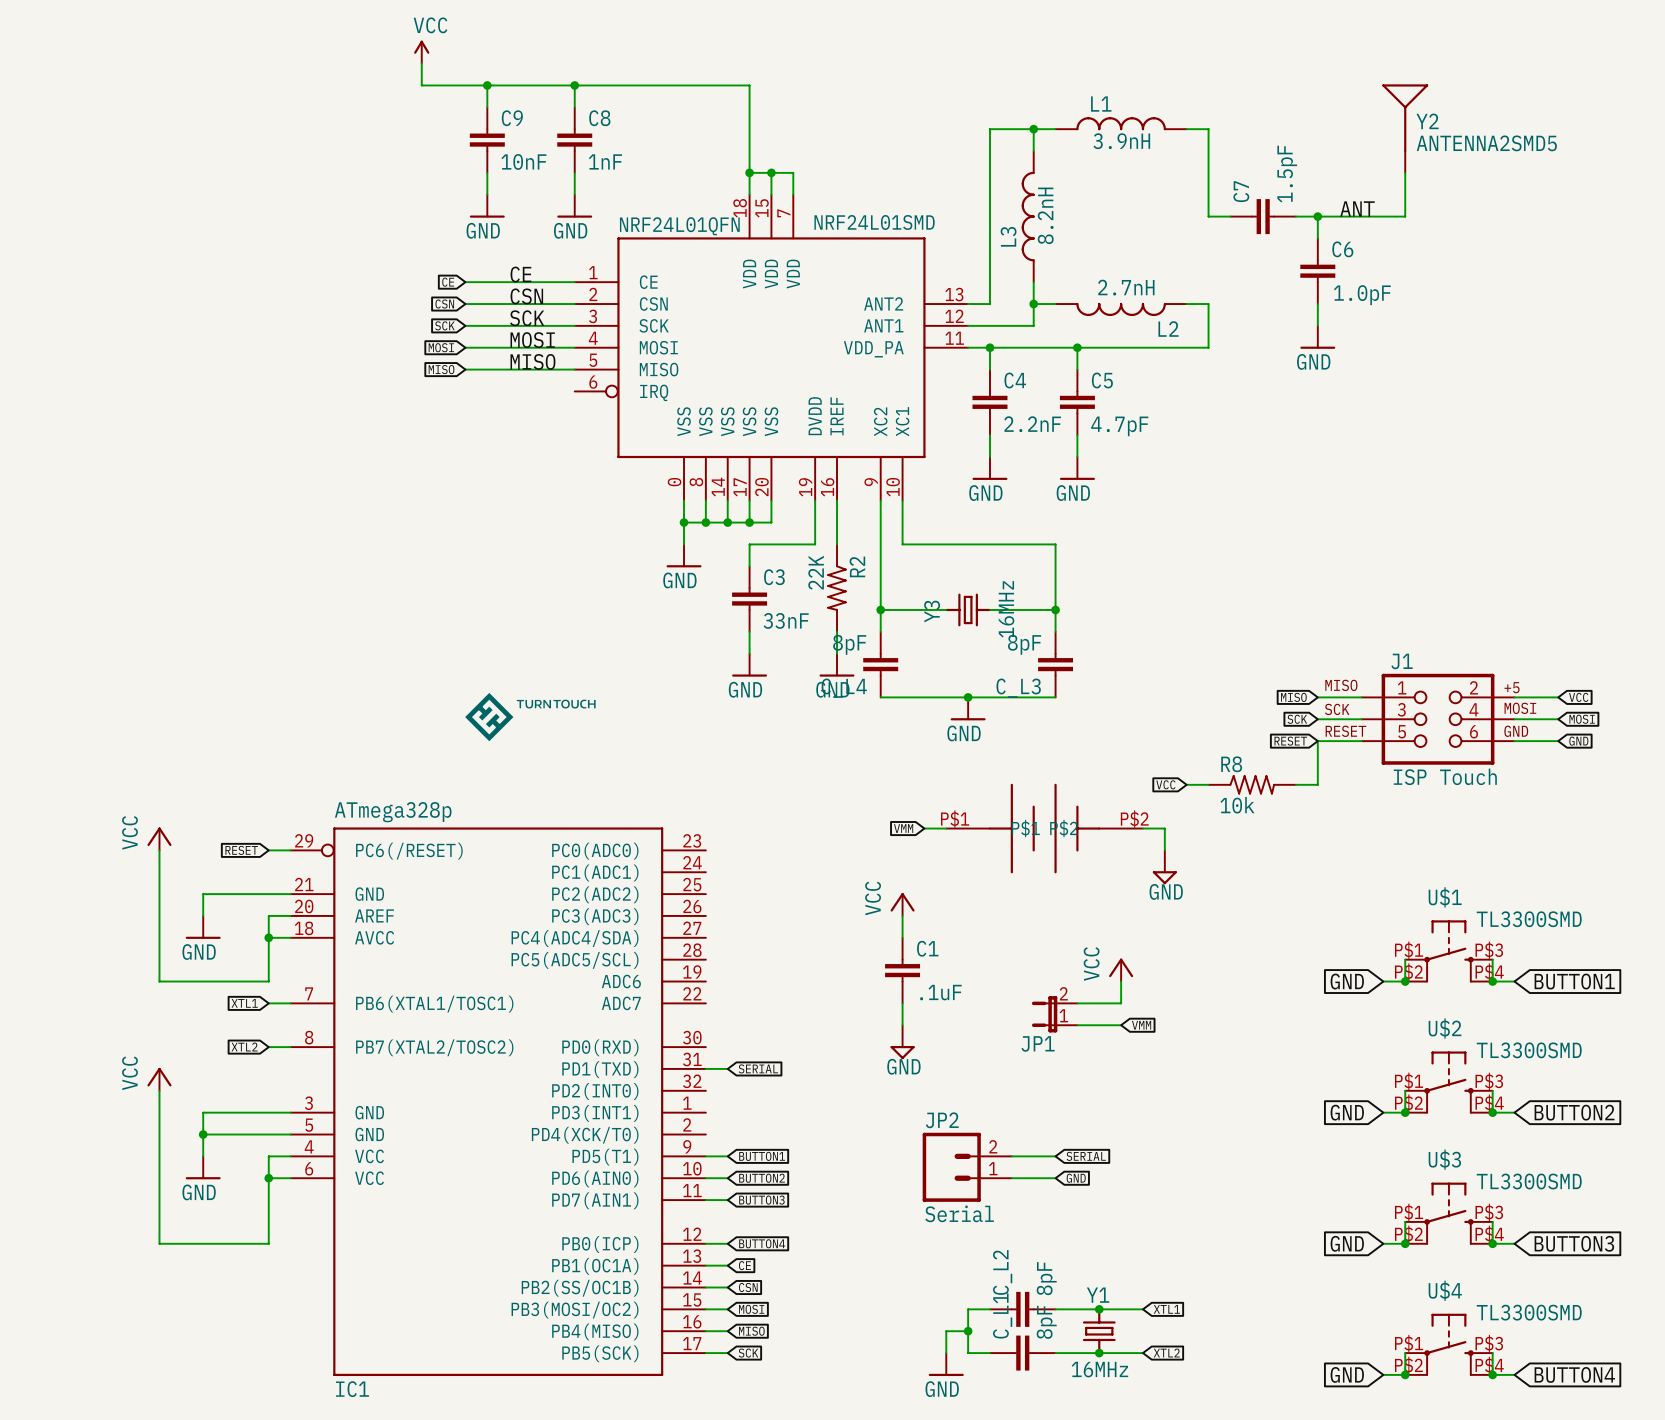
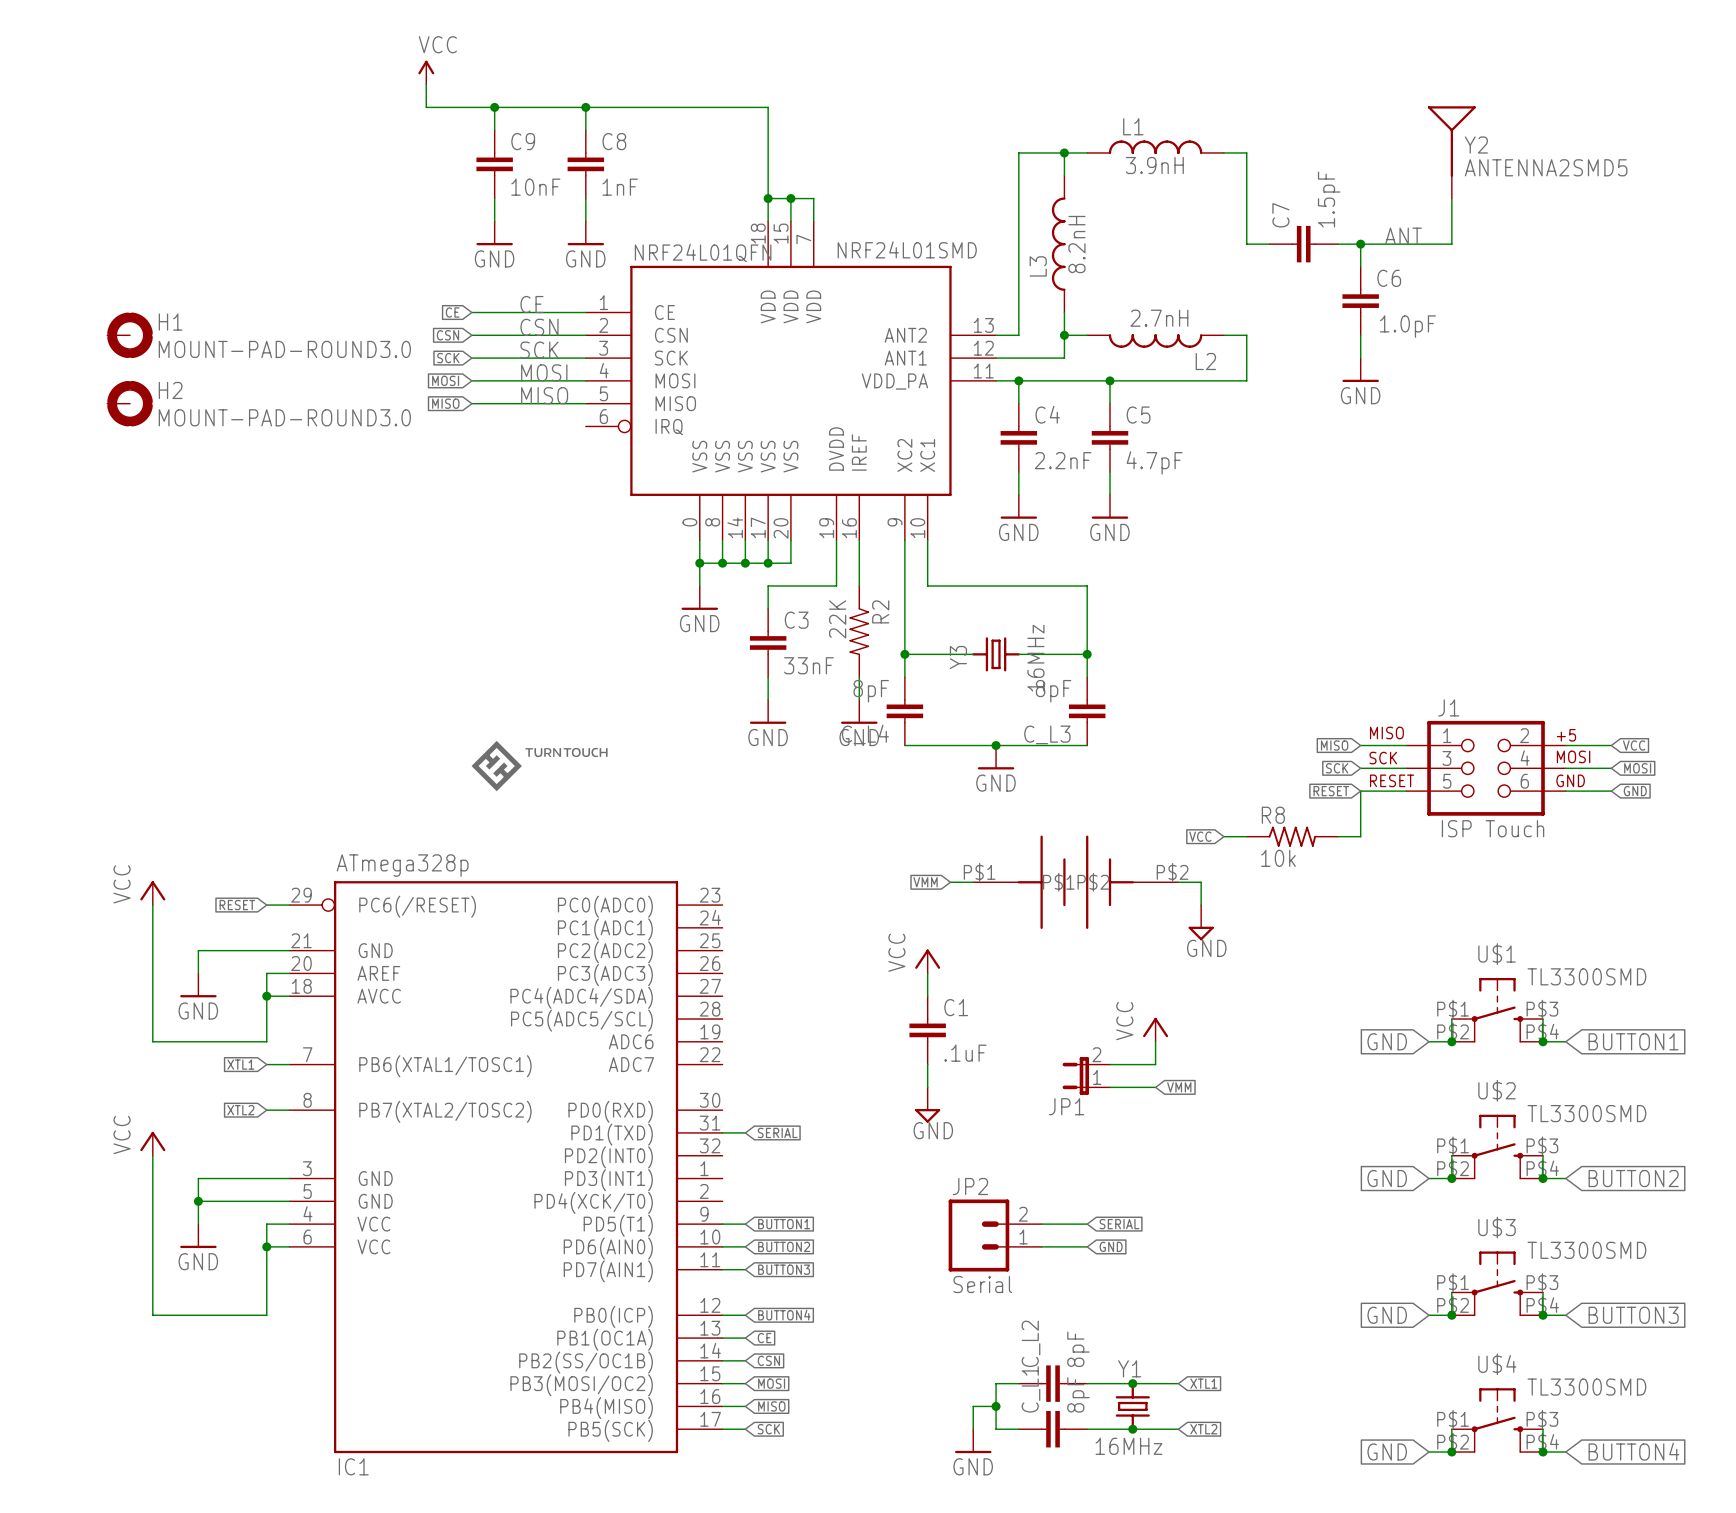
H1: none -> MOUNT-PAD-ROUND3.0 (130, 335)
H2: none -> MOUNT-PAD-ROUND3.0 (130, 403)

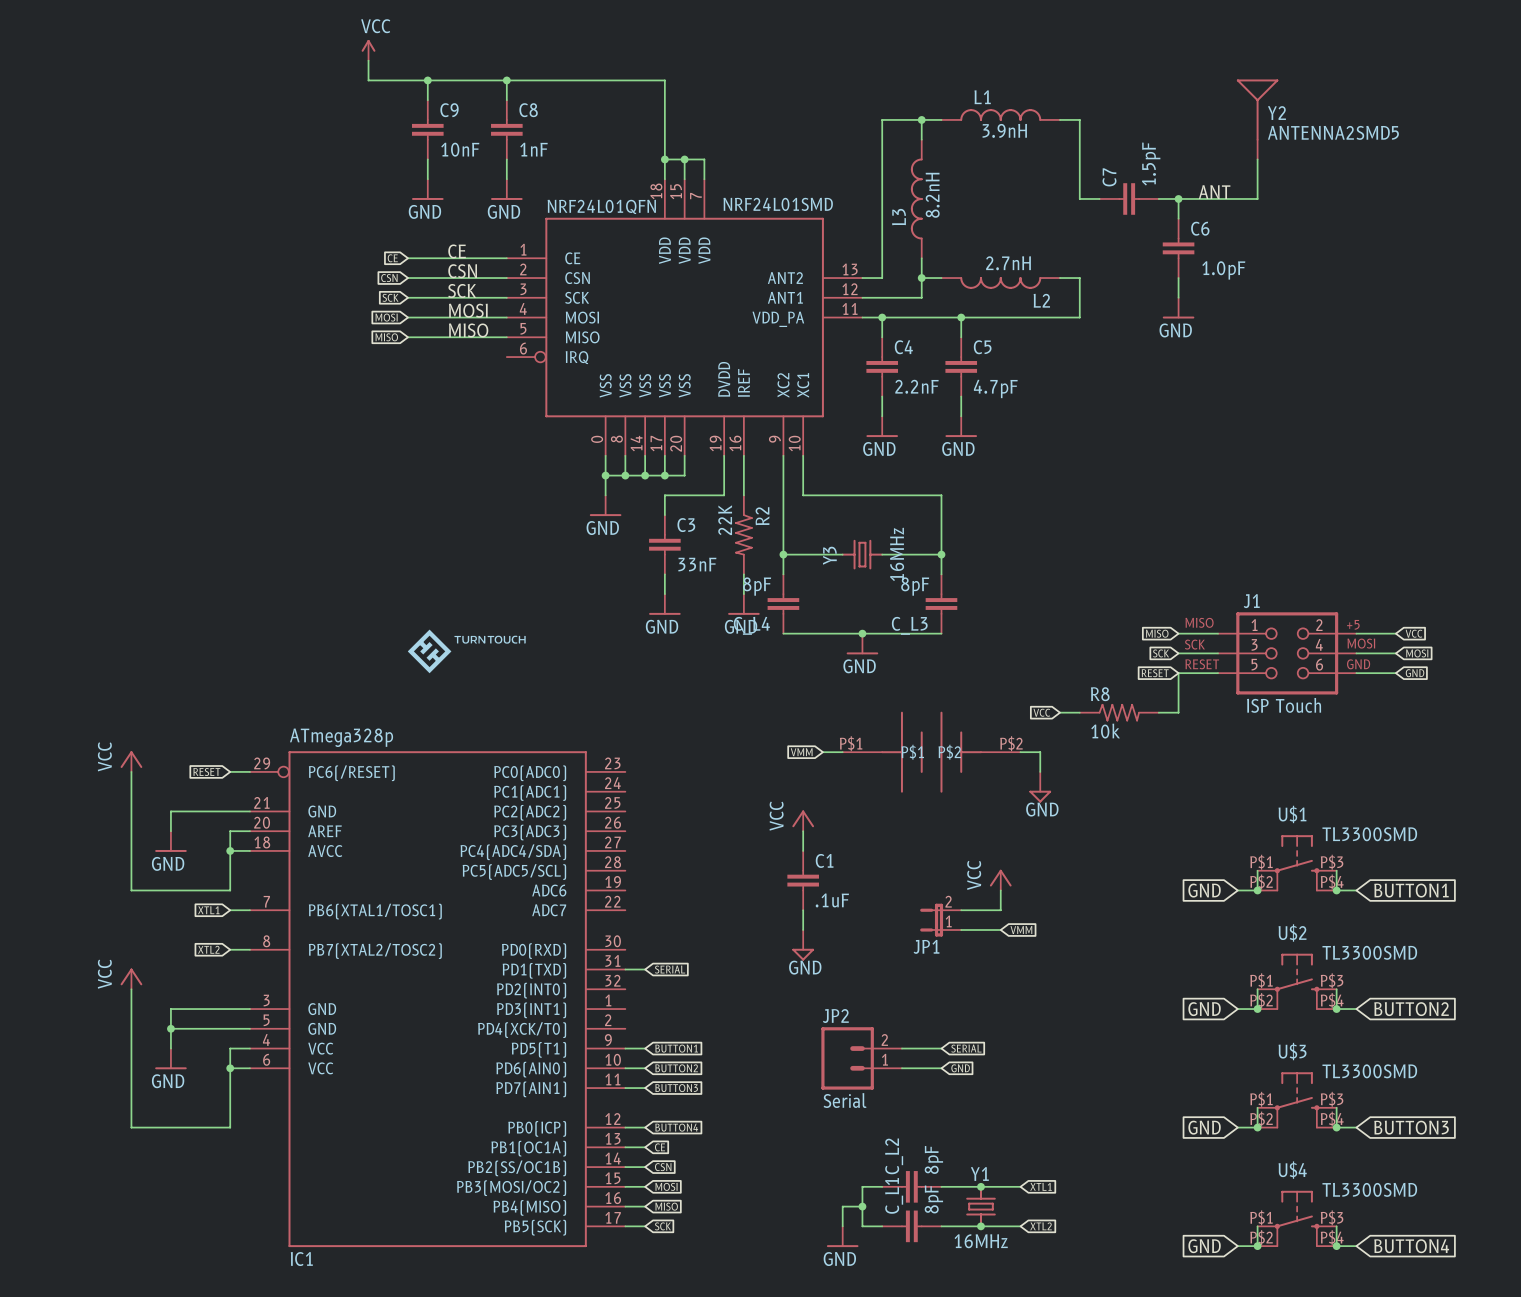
H1: MOUNT-PAD-ROUND3.0 (130, 335) -> none
H2: MOUNT-PAD-ROUND3.0 (130, 403) -> none

